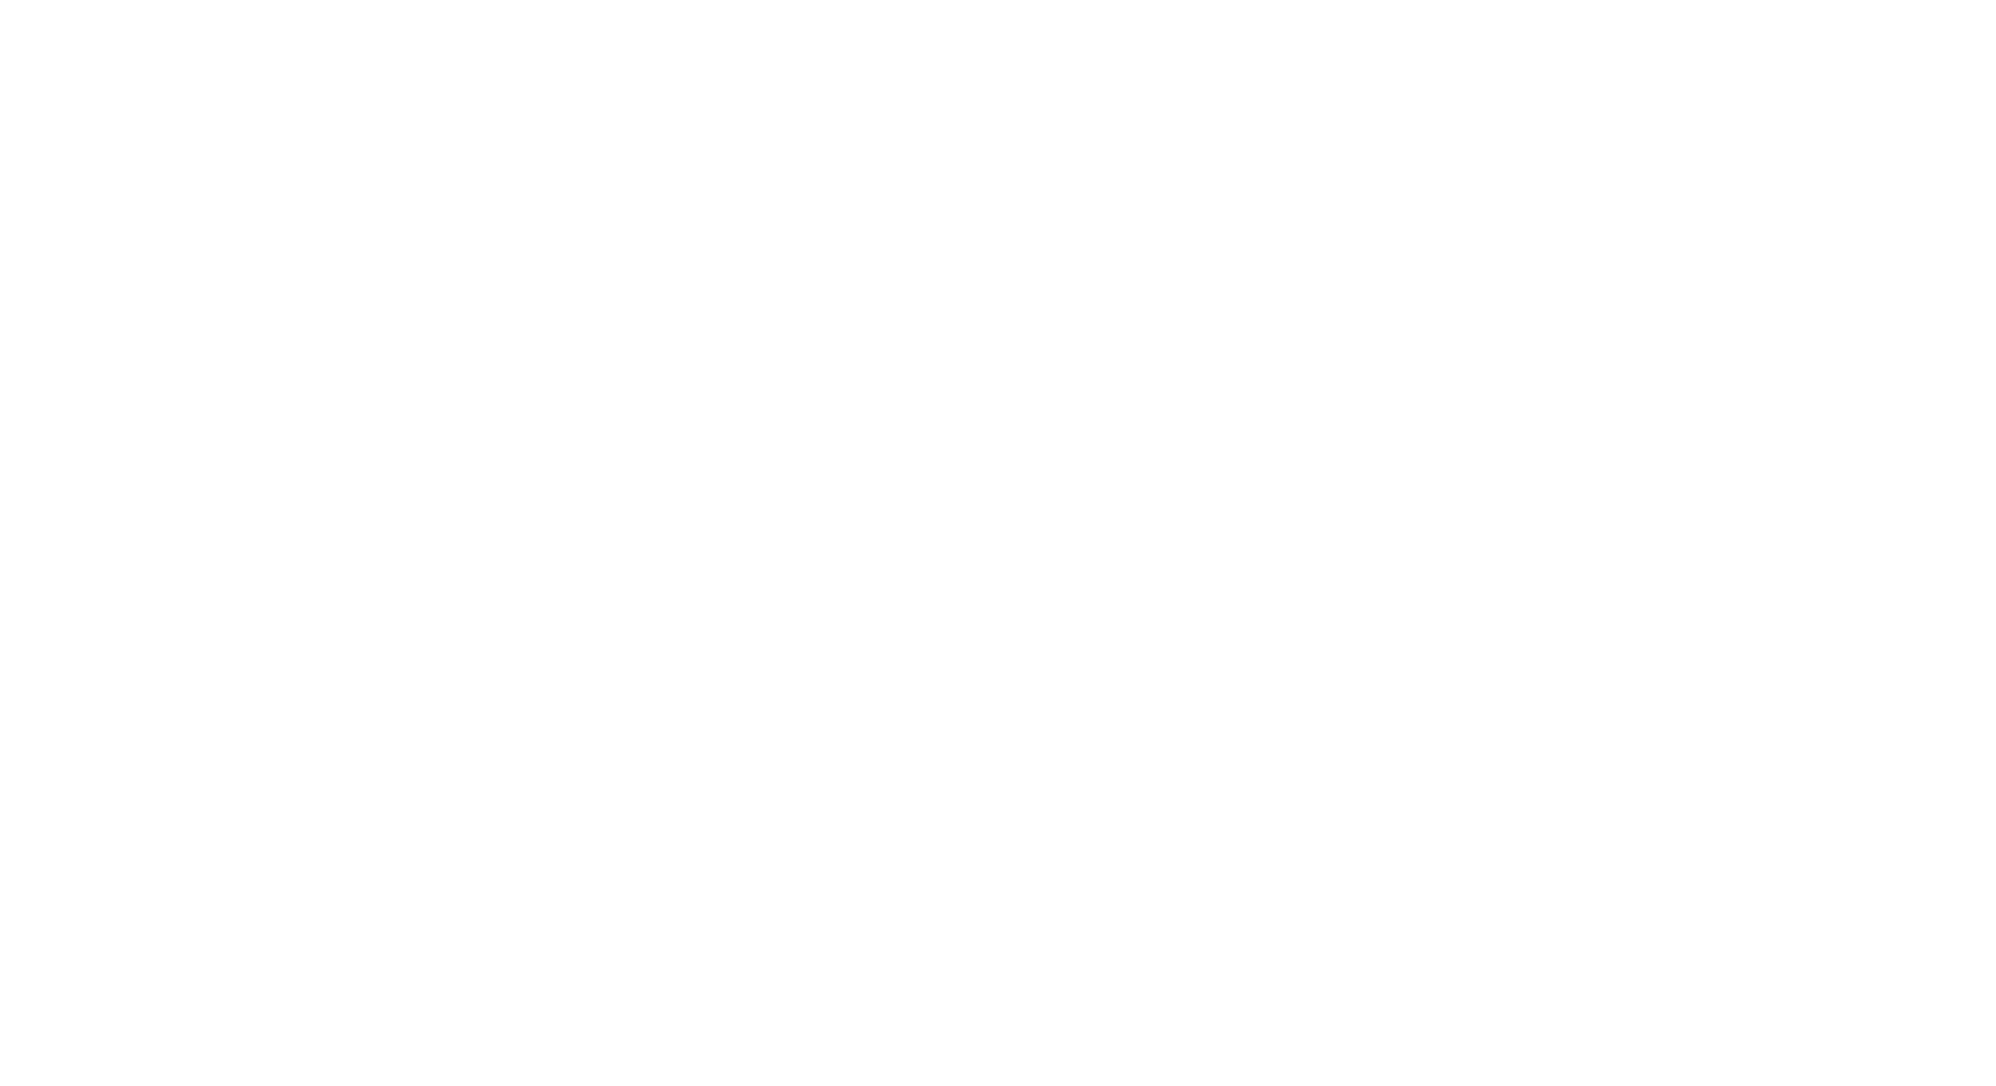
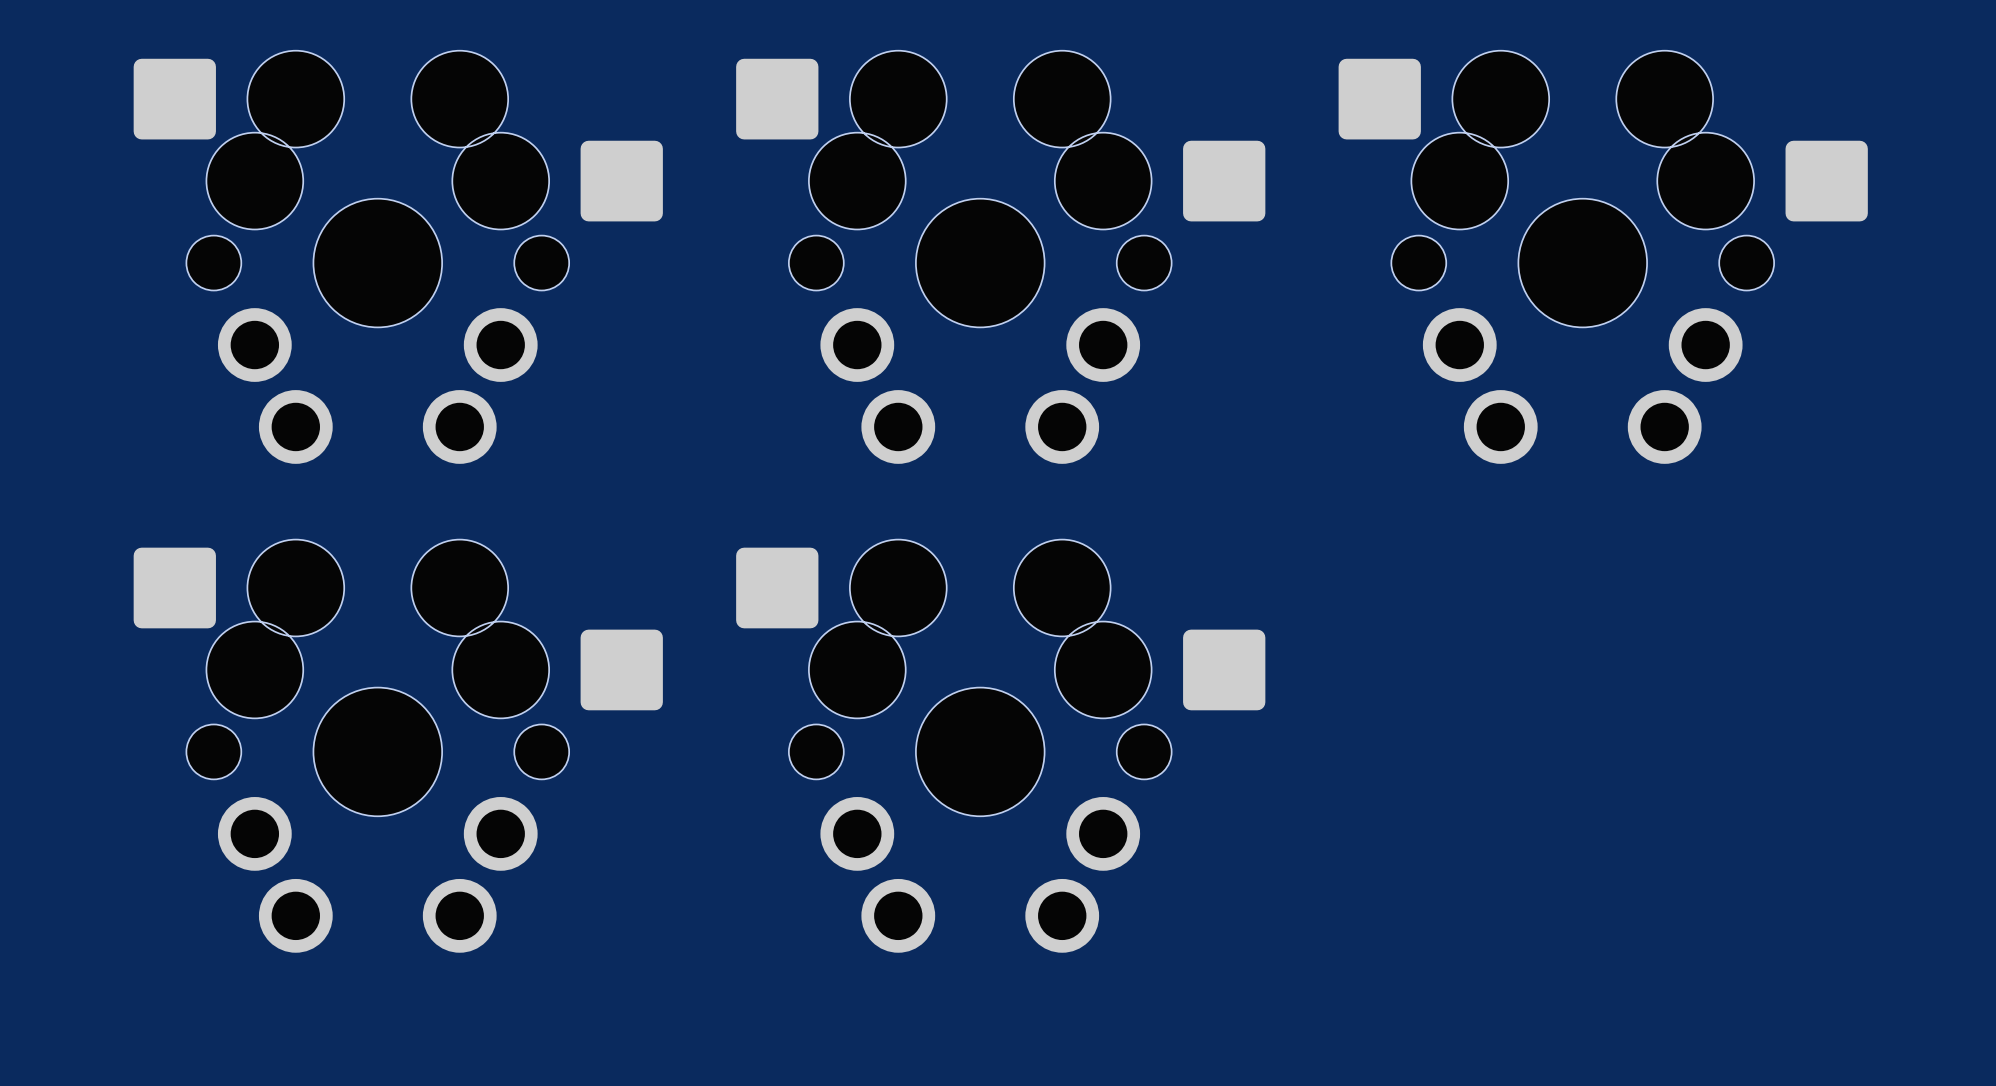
part: none -> (398, 257)
part: none -> (1000, 257)
part: none -> (1603, 257)
part: none -> (398, 746)
part: none -> (1000, 746)

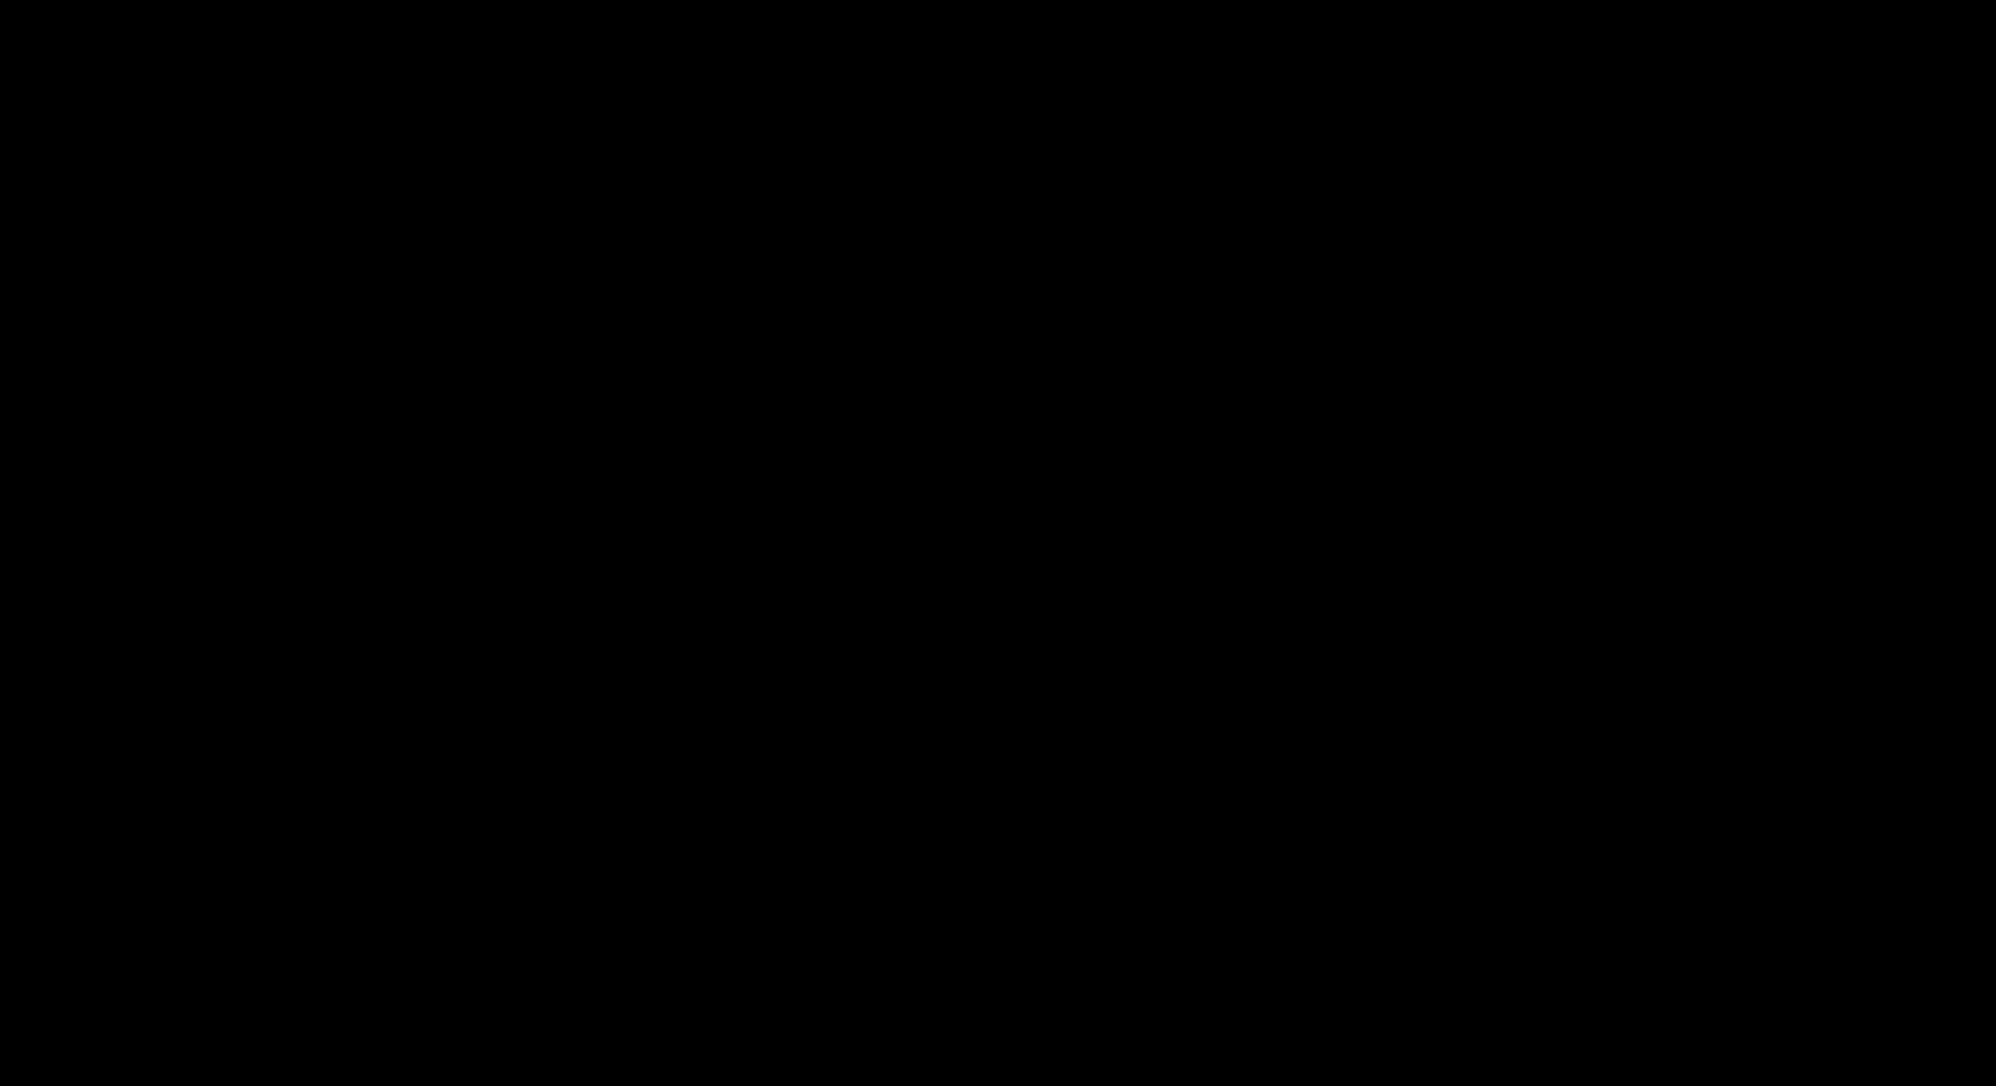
part: (398, 257) -> none
part: (1000, 257) -> none
part: (1603, 257) -> none
part: (398, 746) -> none
part: (1000, 746) -> none

